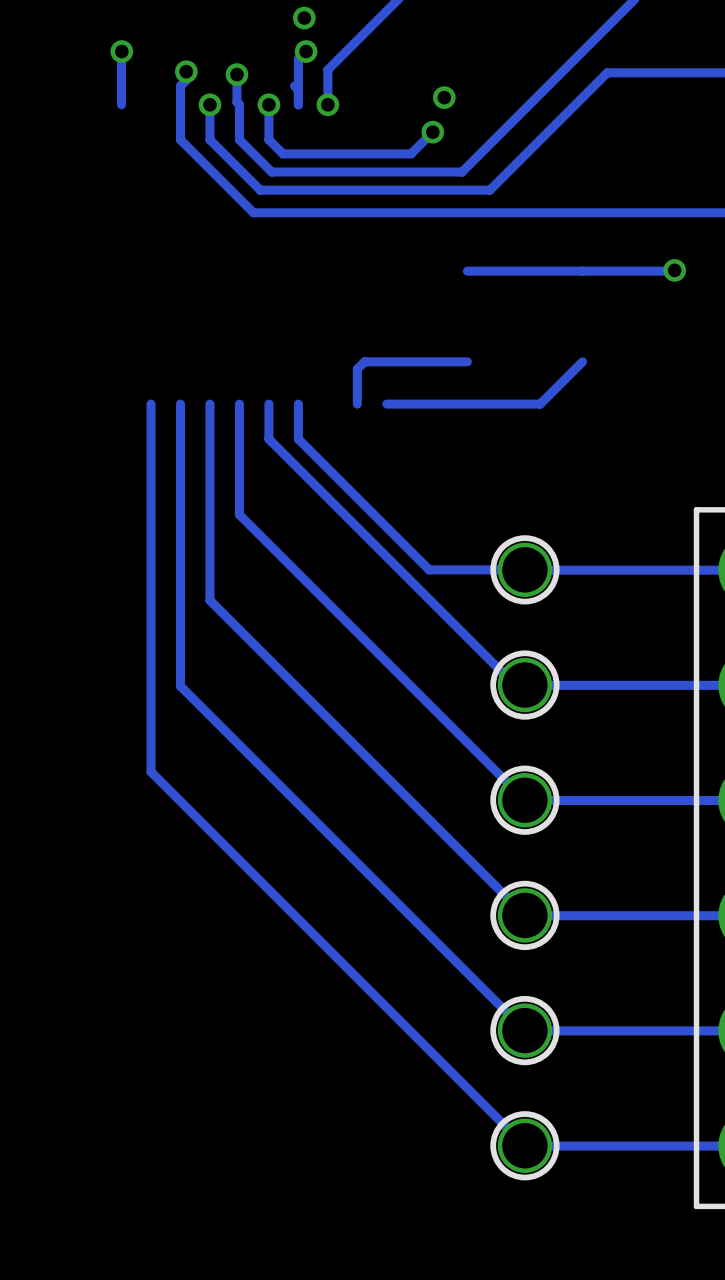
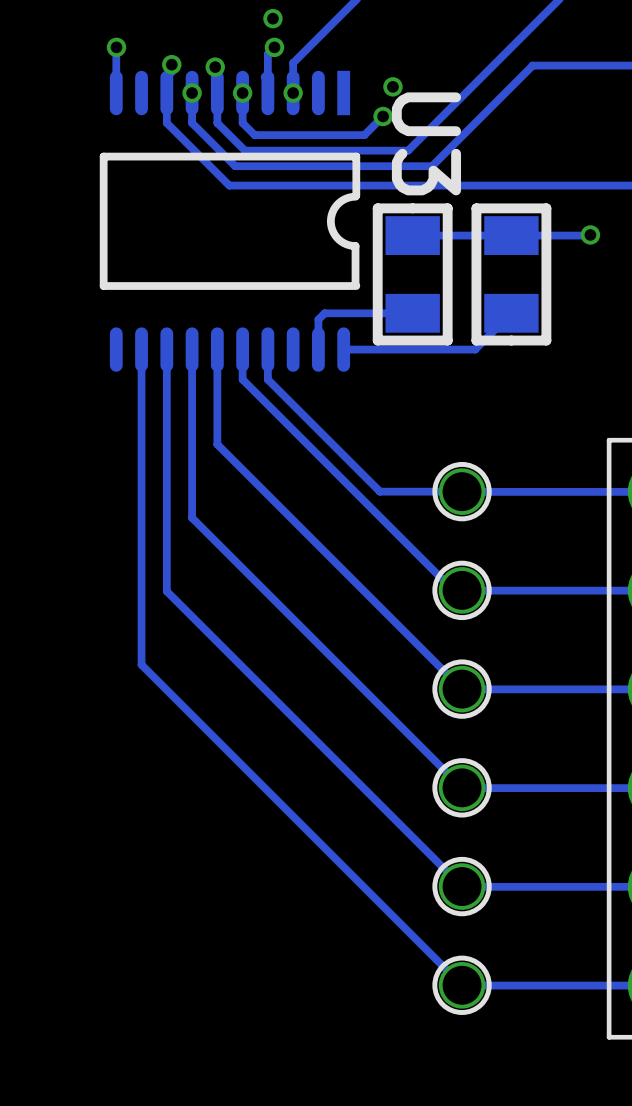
U3: none -> (229, 221)
part: none -> (412, 274)
part: none -> (511, 274)

